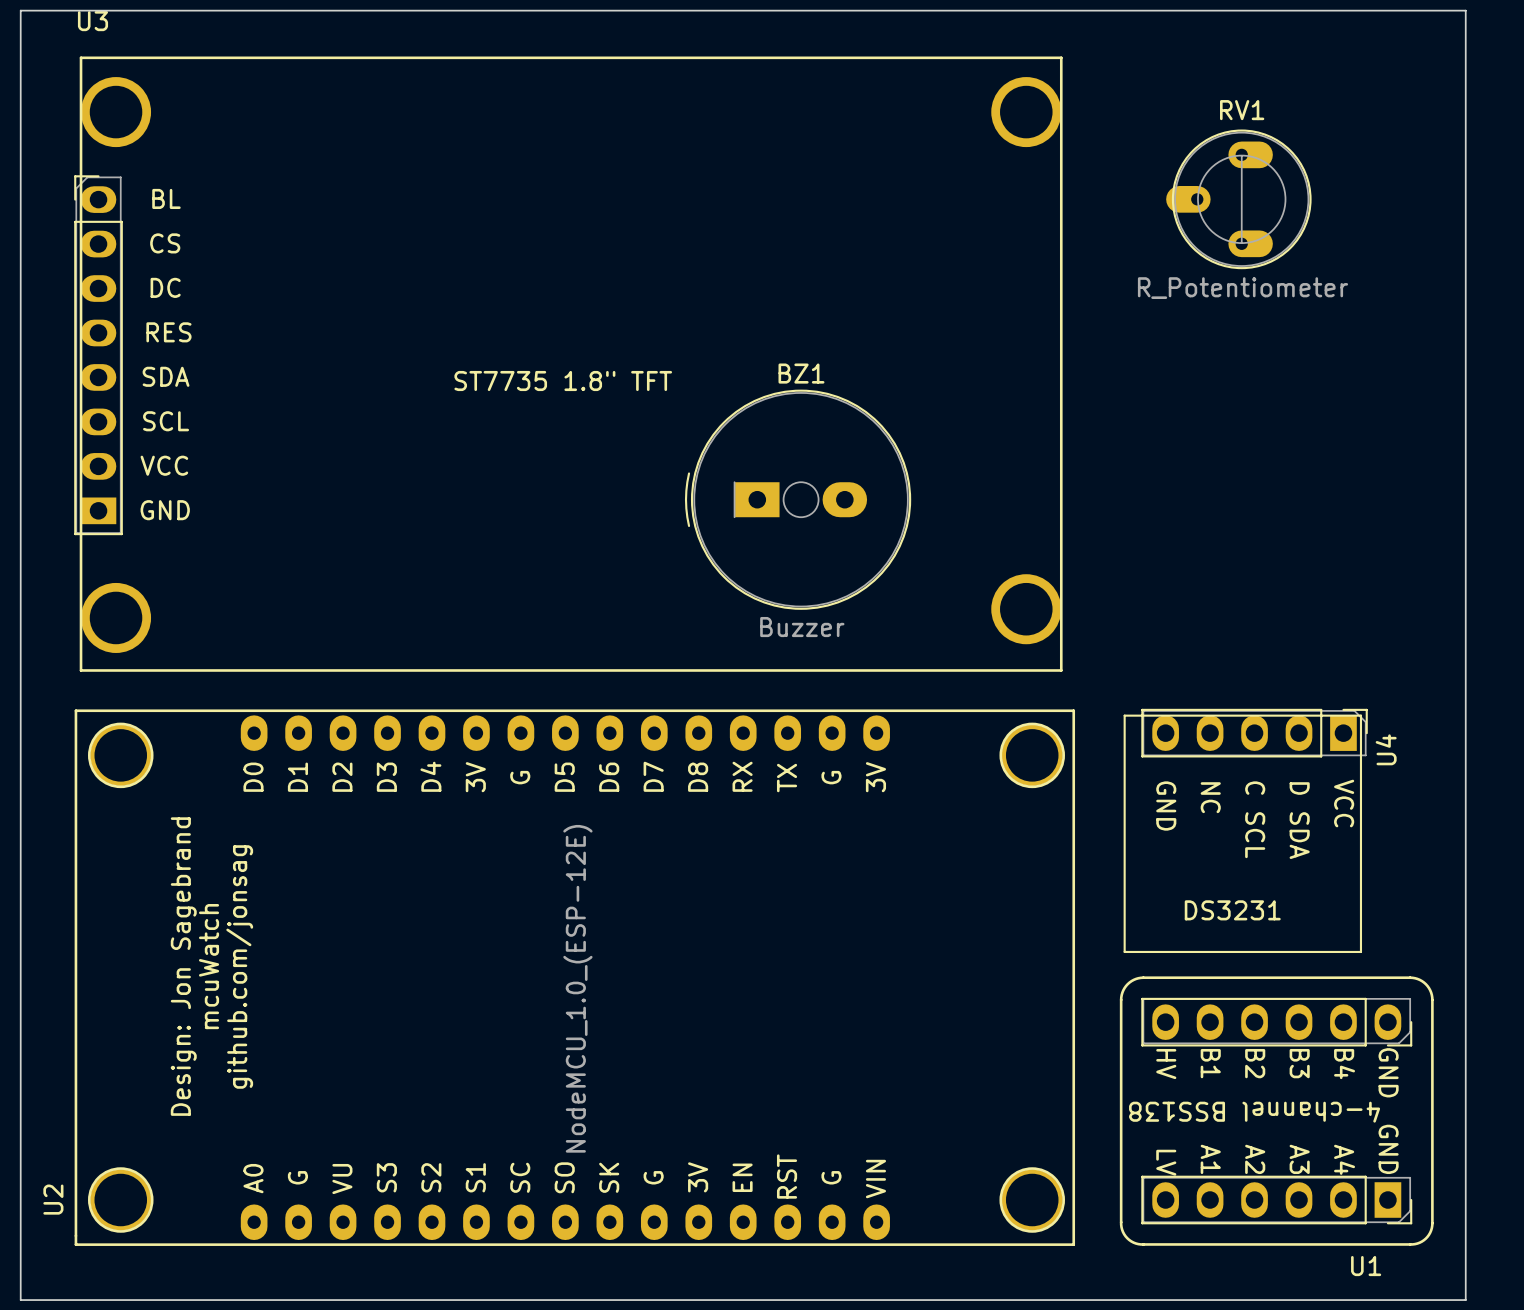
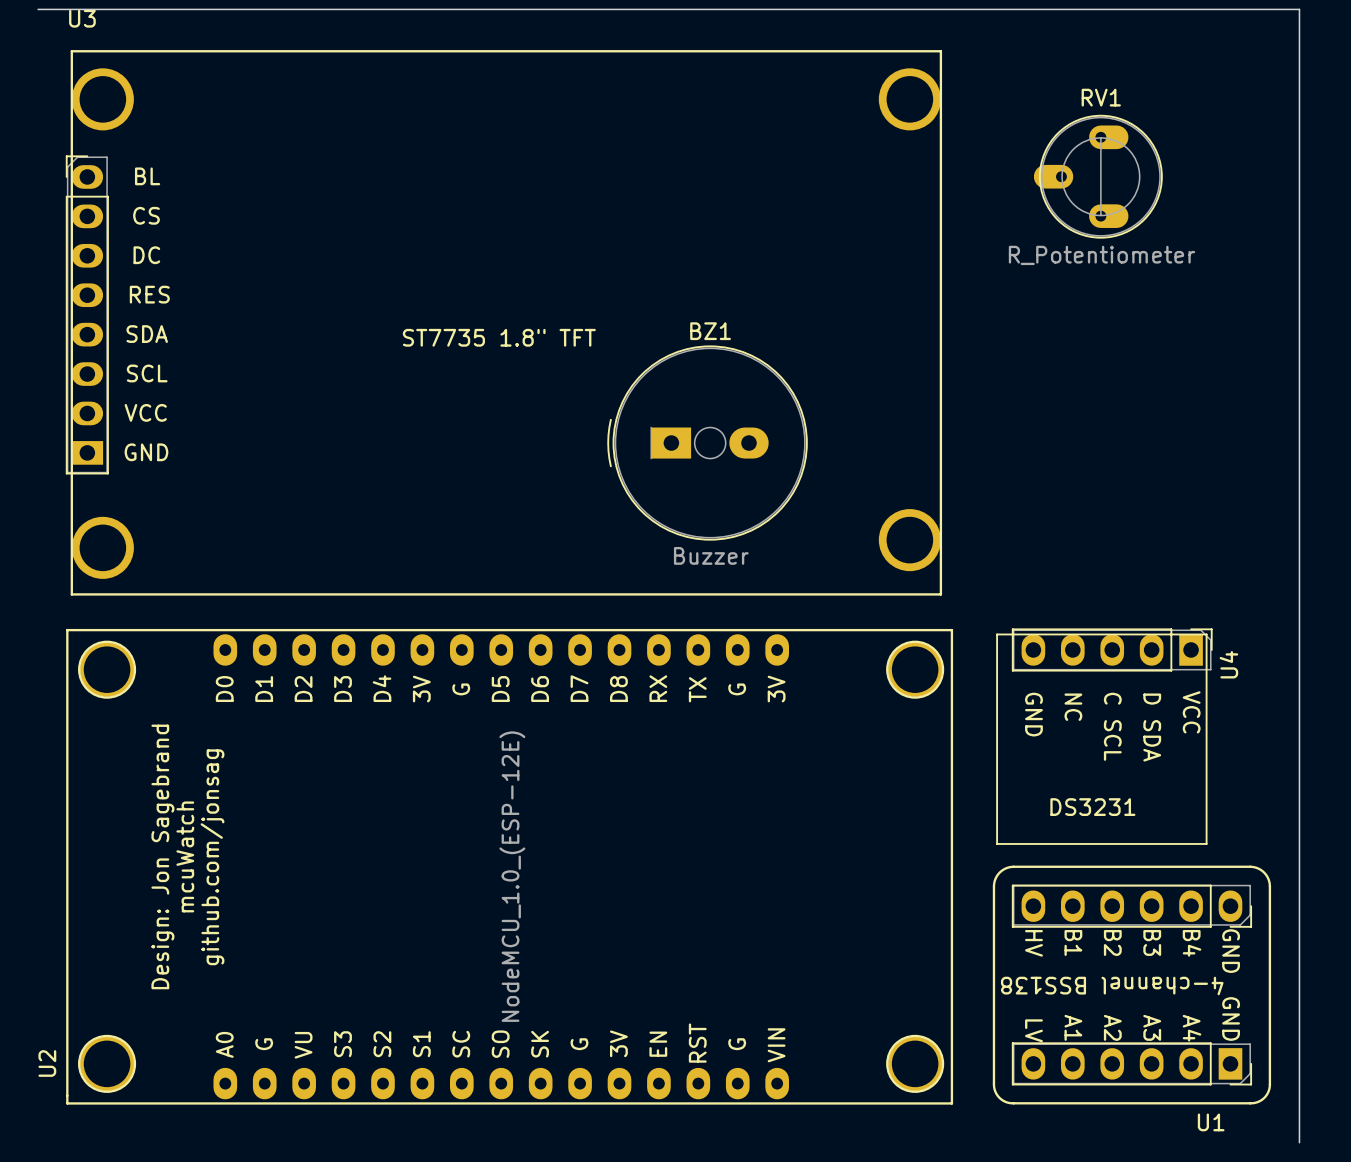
board edge: (42, 10) (20, 10) (20, 1300) (1465, 1300) (1465, 1288) -> none

